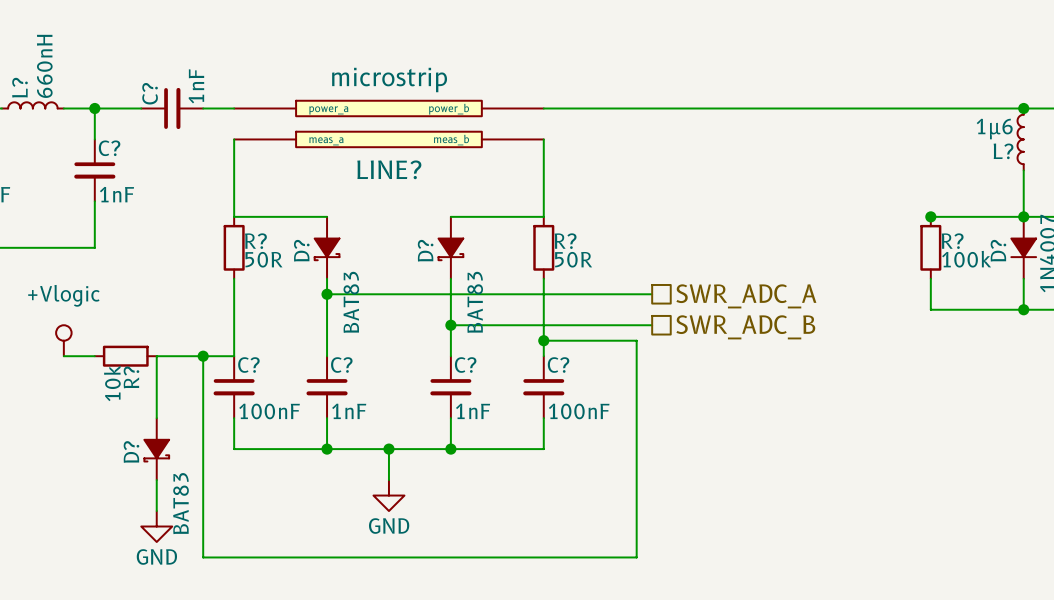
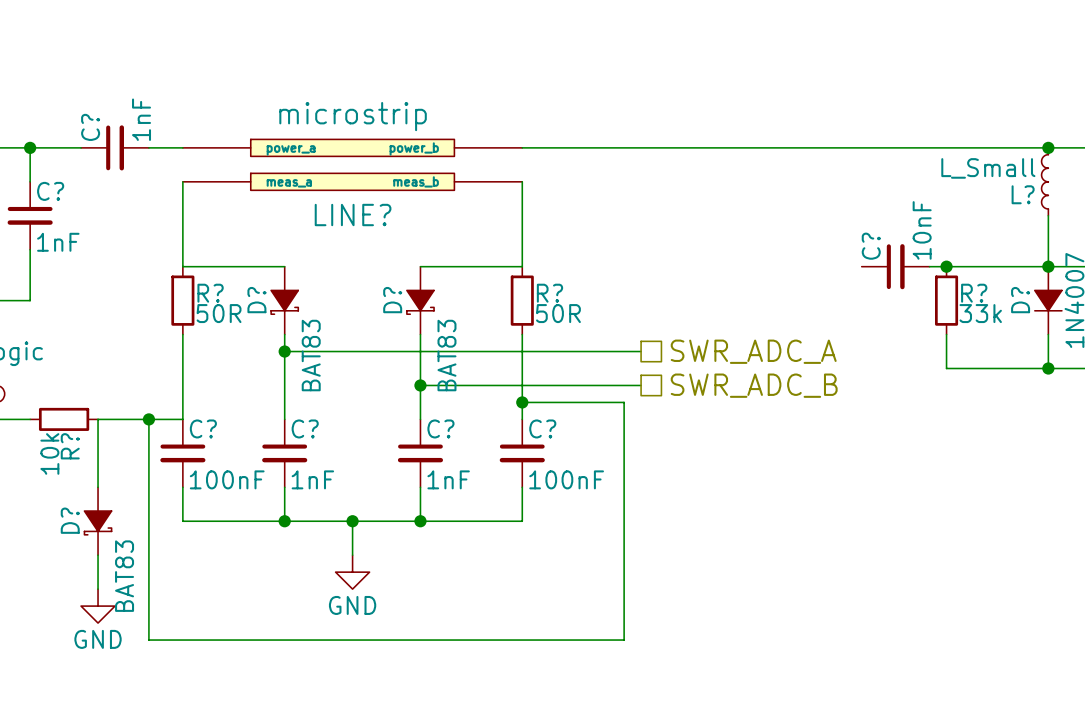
L? value: 1µ6 (994, 129) -> L_Small (988, 168)
C?: none -> 10nF (895, 266)
wire: none -> (929, 266) (946, 266)
R? value: 100k (966, 259) -> 33k (980, 313)

